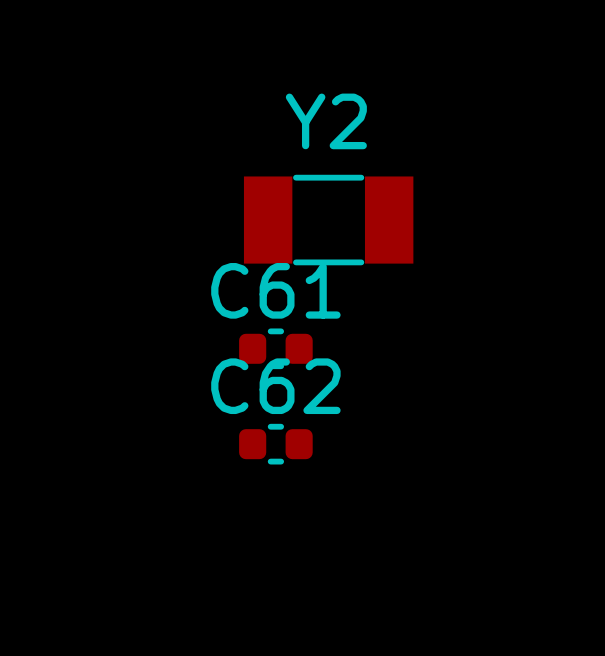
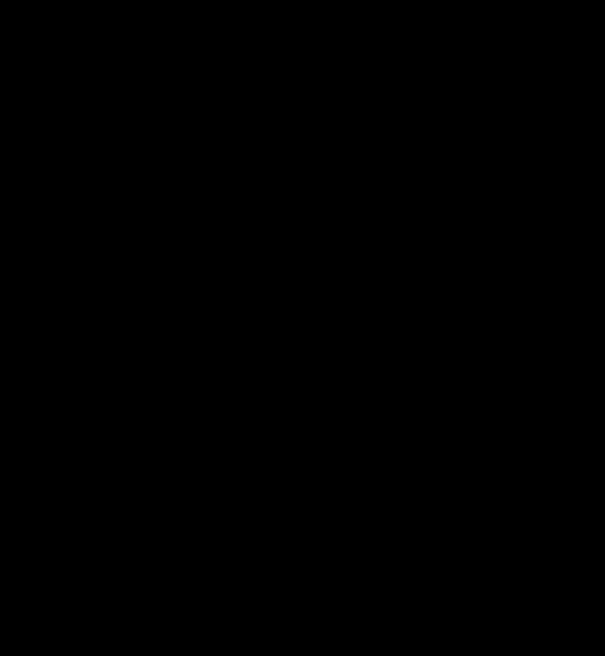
Y2: (328, 220) -> none
C61: (275, 348) -> none
C62: (275, 444) -> none

